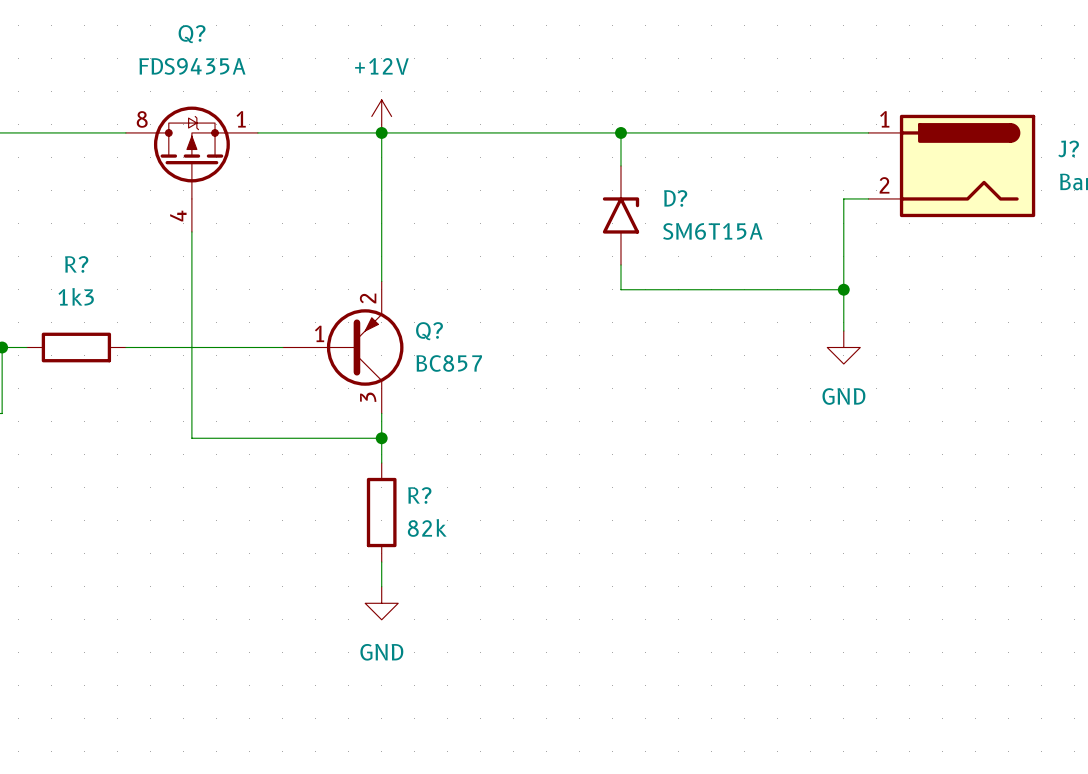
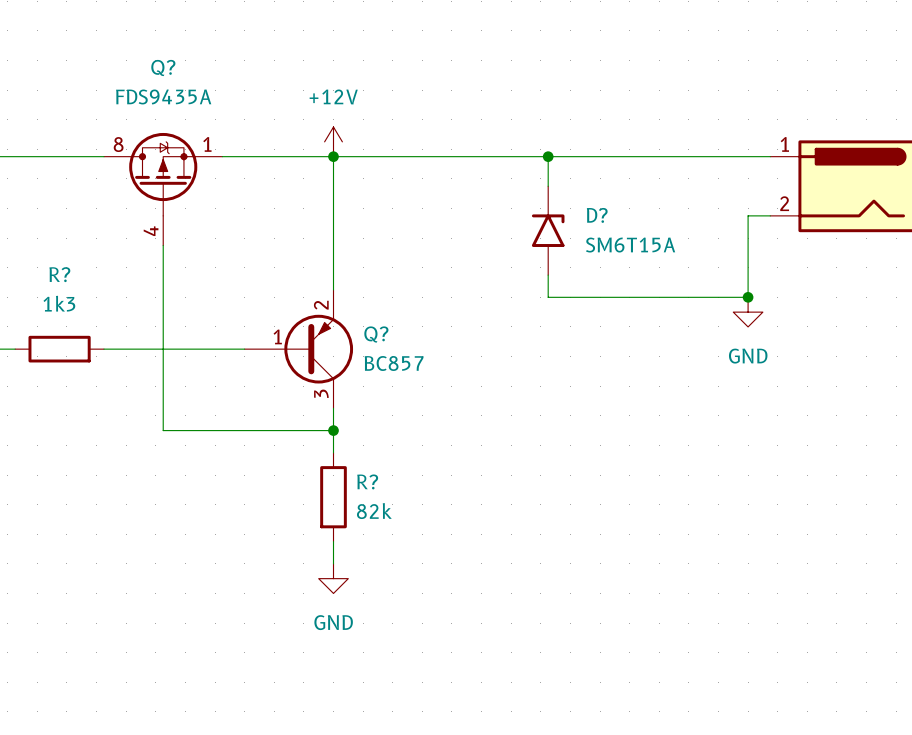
wire: (843, 289) (843, 330) -> none
power symbol position: GND (843, 347) -> GND (748, 312)

